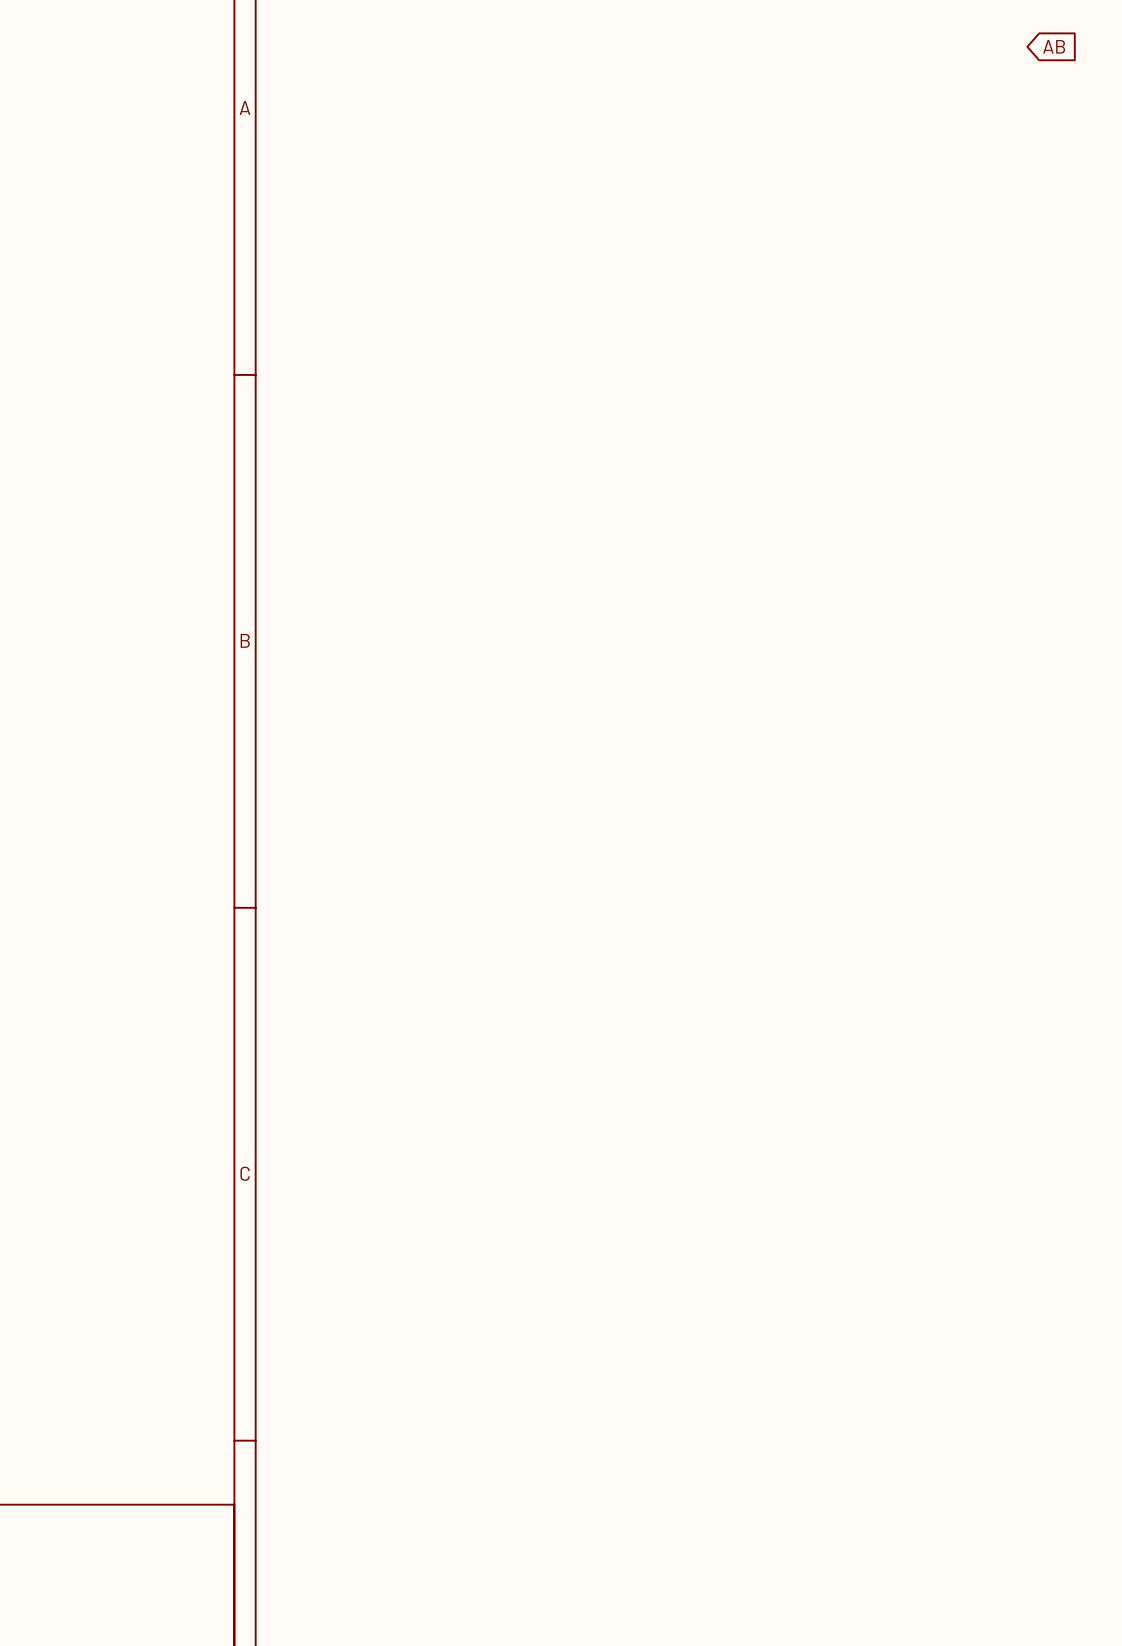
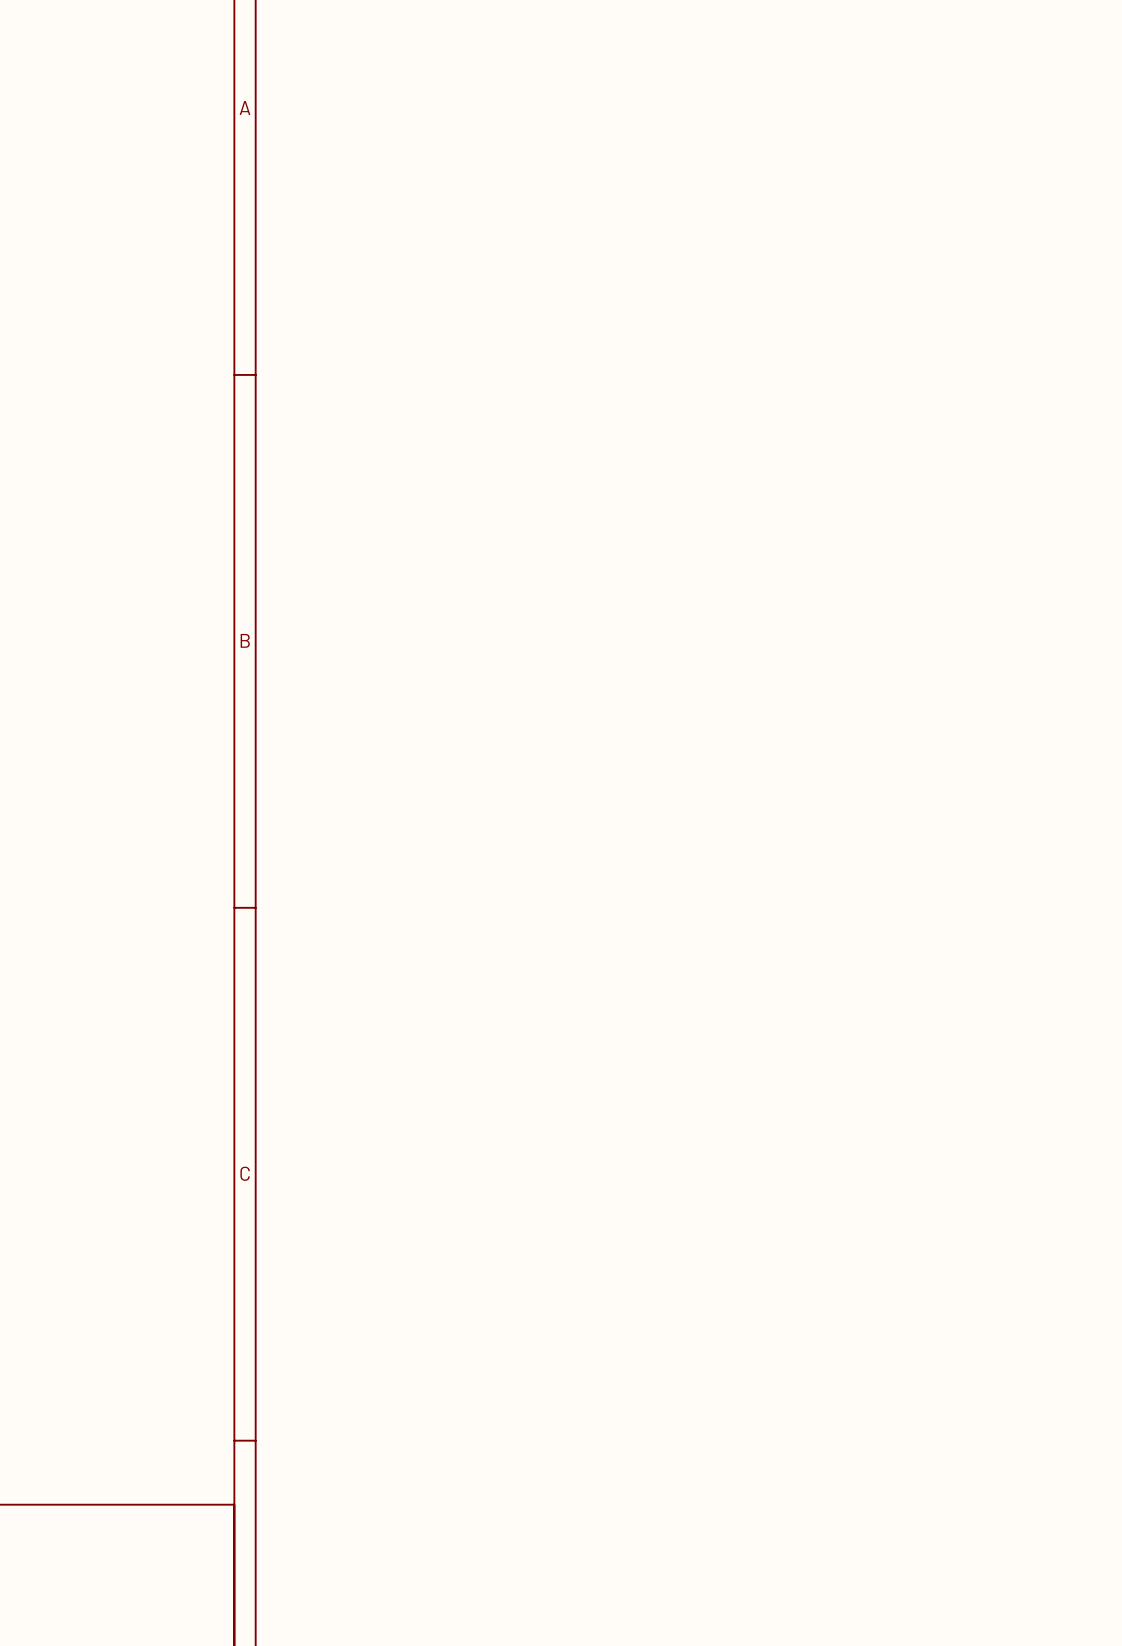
global label: AB (1054, 46) -> none

